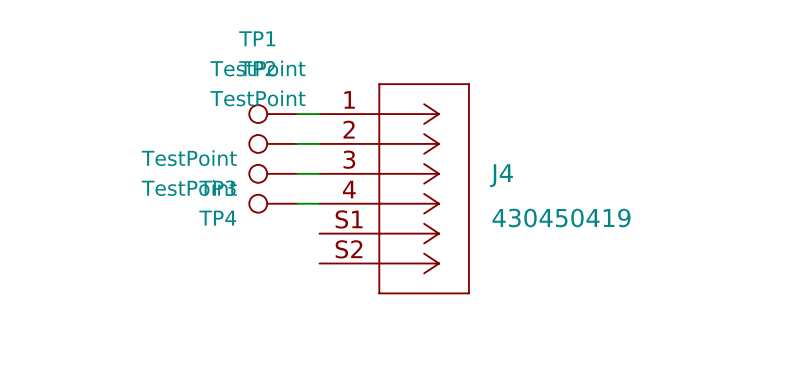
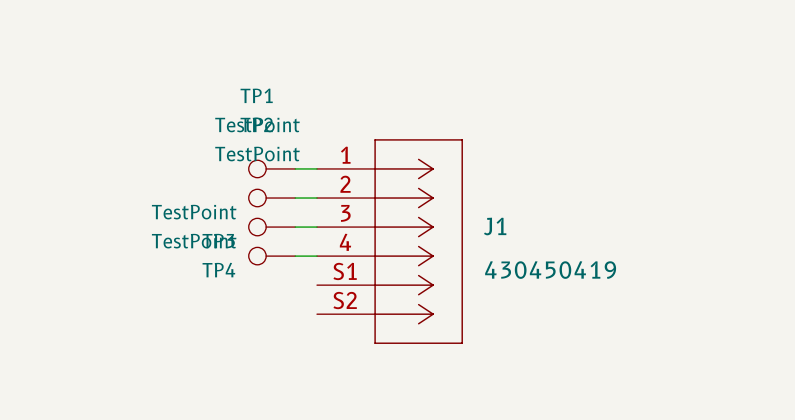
J4 name: J4 (501, 175) -> J1 (495, 226)

